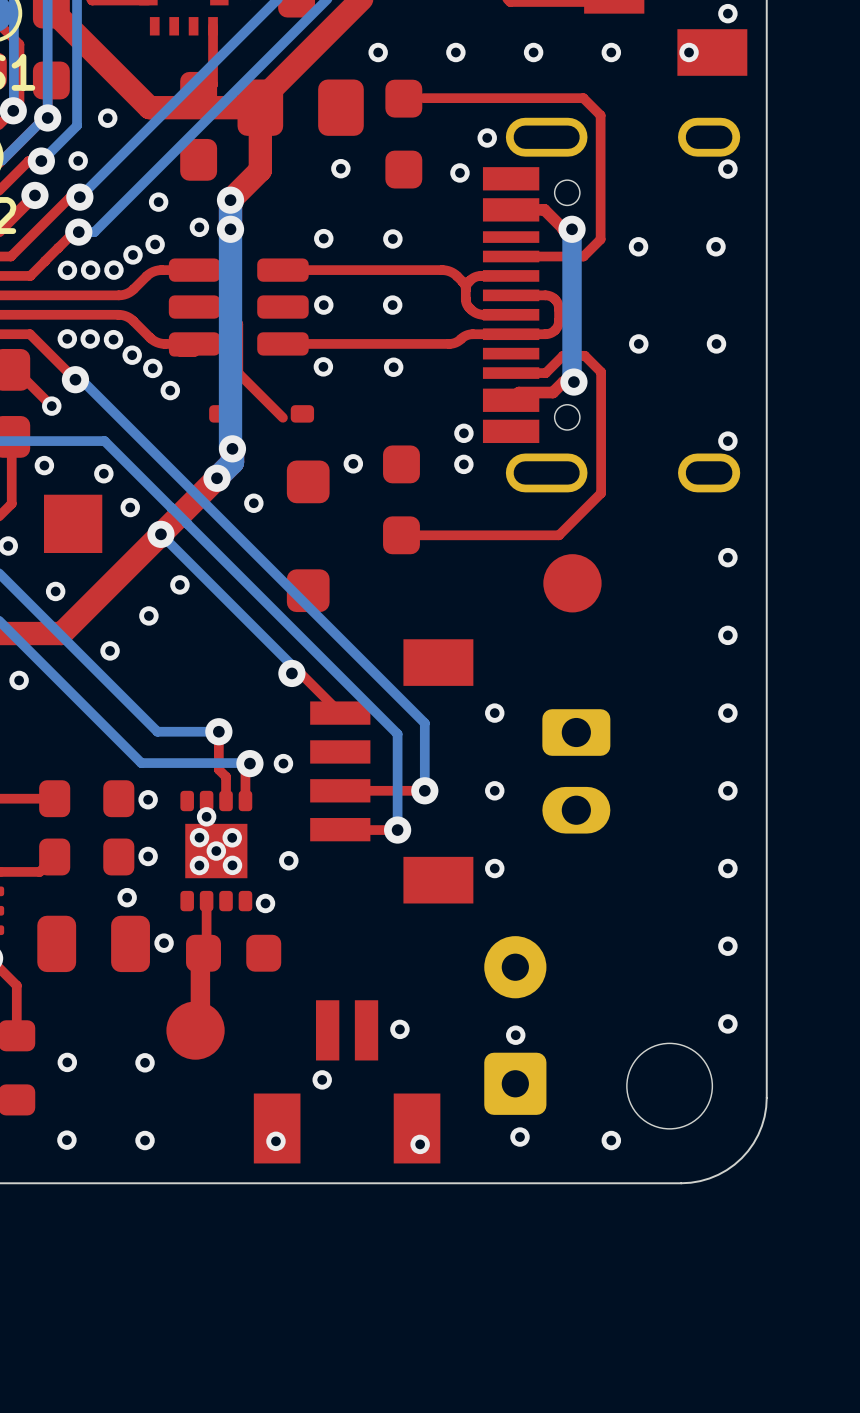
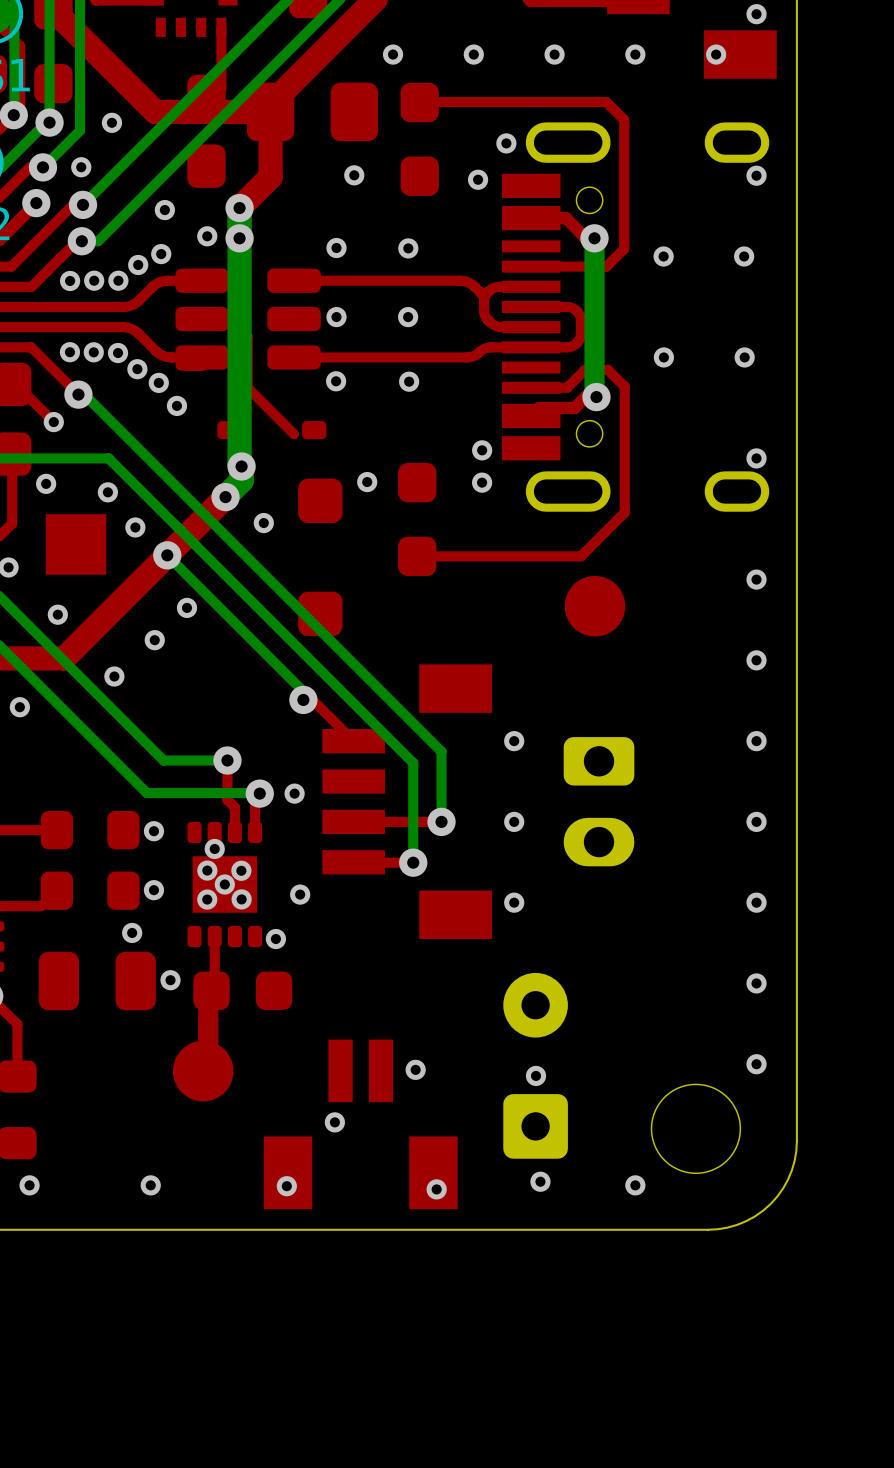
via: (67, 1062) -> none
via: (145, 1062) -> none
via position: (66, 1140) -> (29, 1185)

